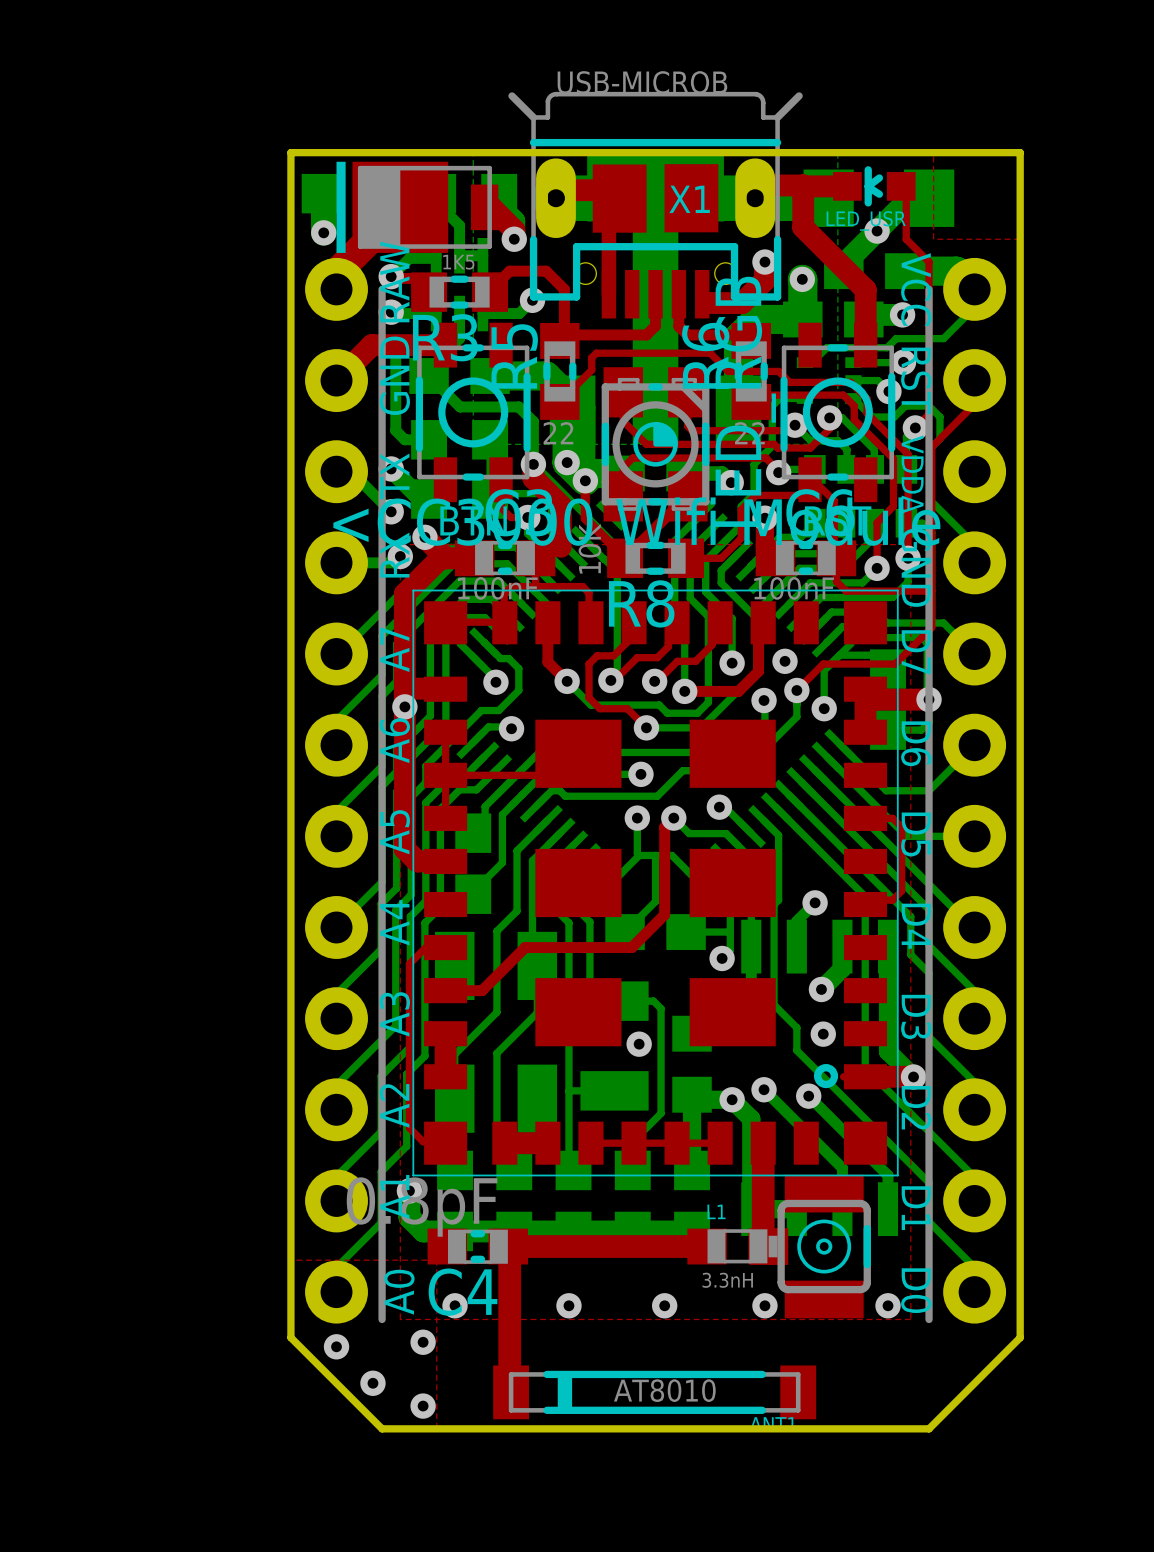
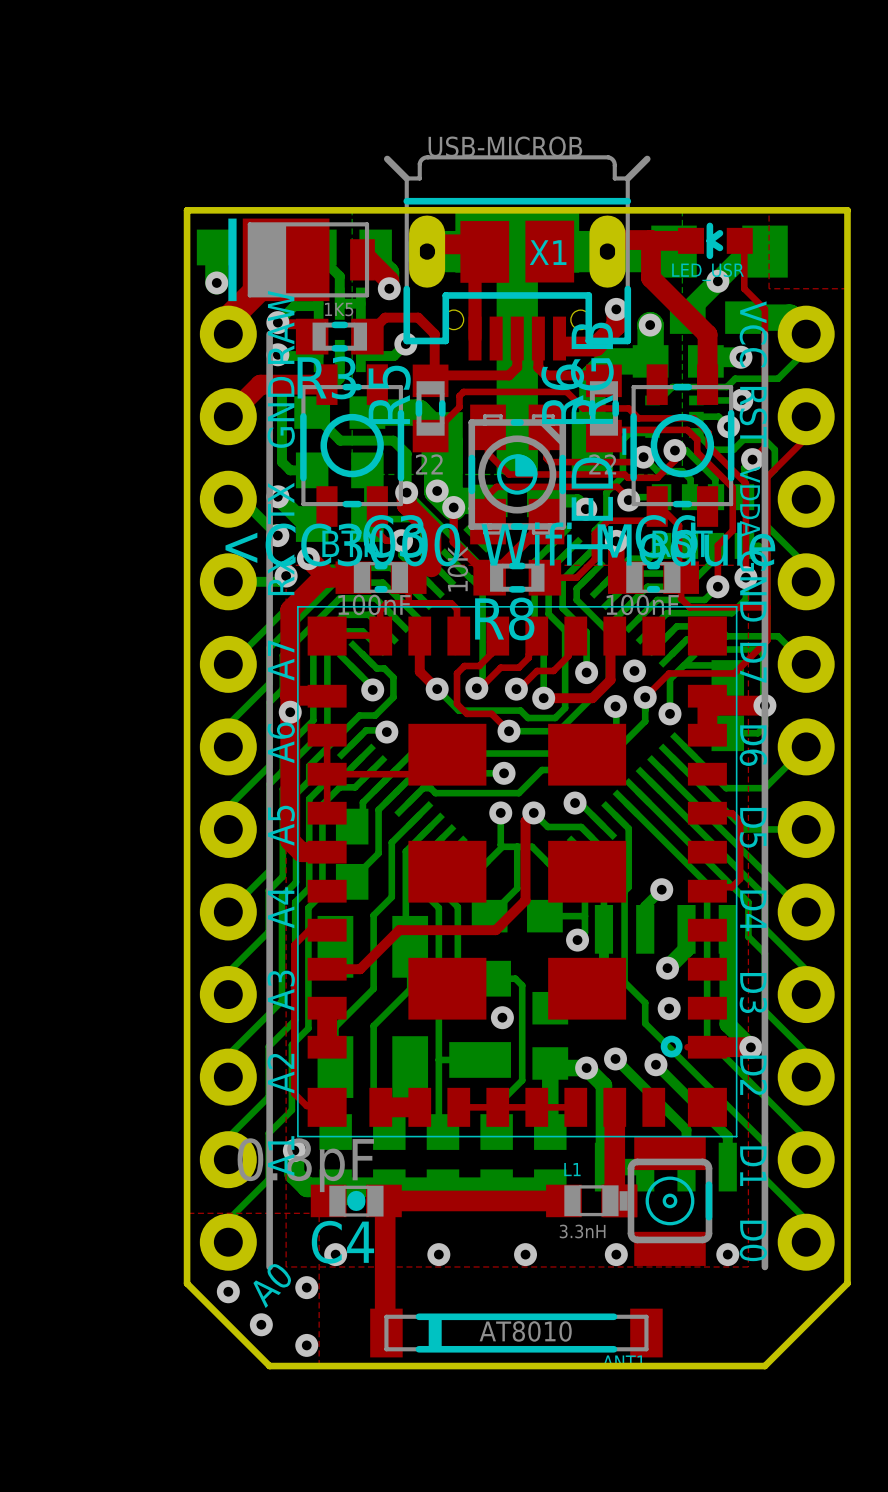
C4 footprint: [427, 1228, 529, 1265] -> [310, 1184, 402, 1218]
text rotation: 0° (399, 1292) -> 45° clockwise (272, 1285)

